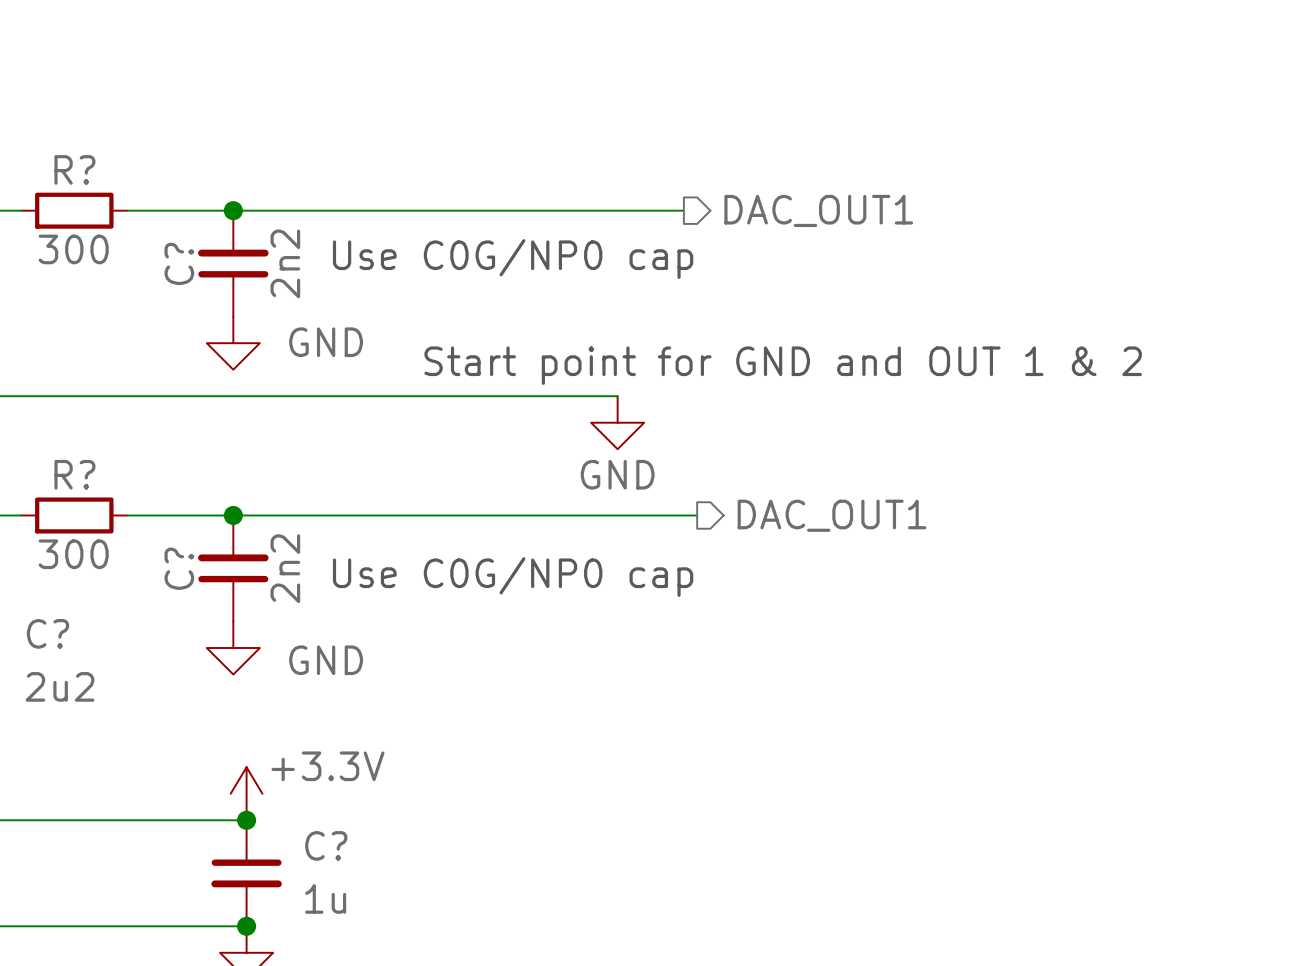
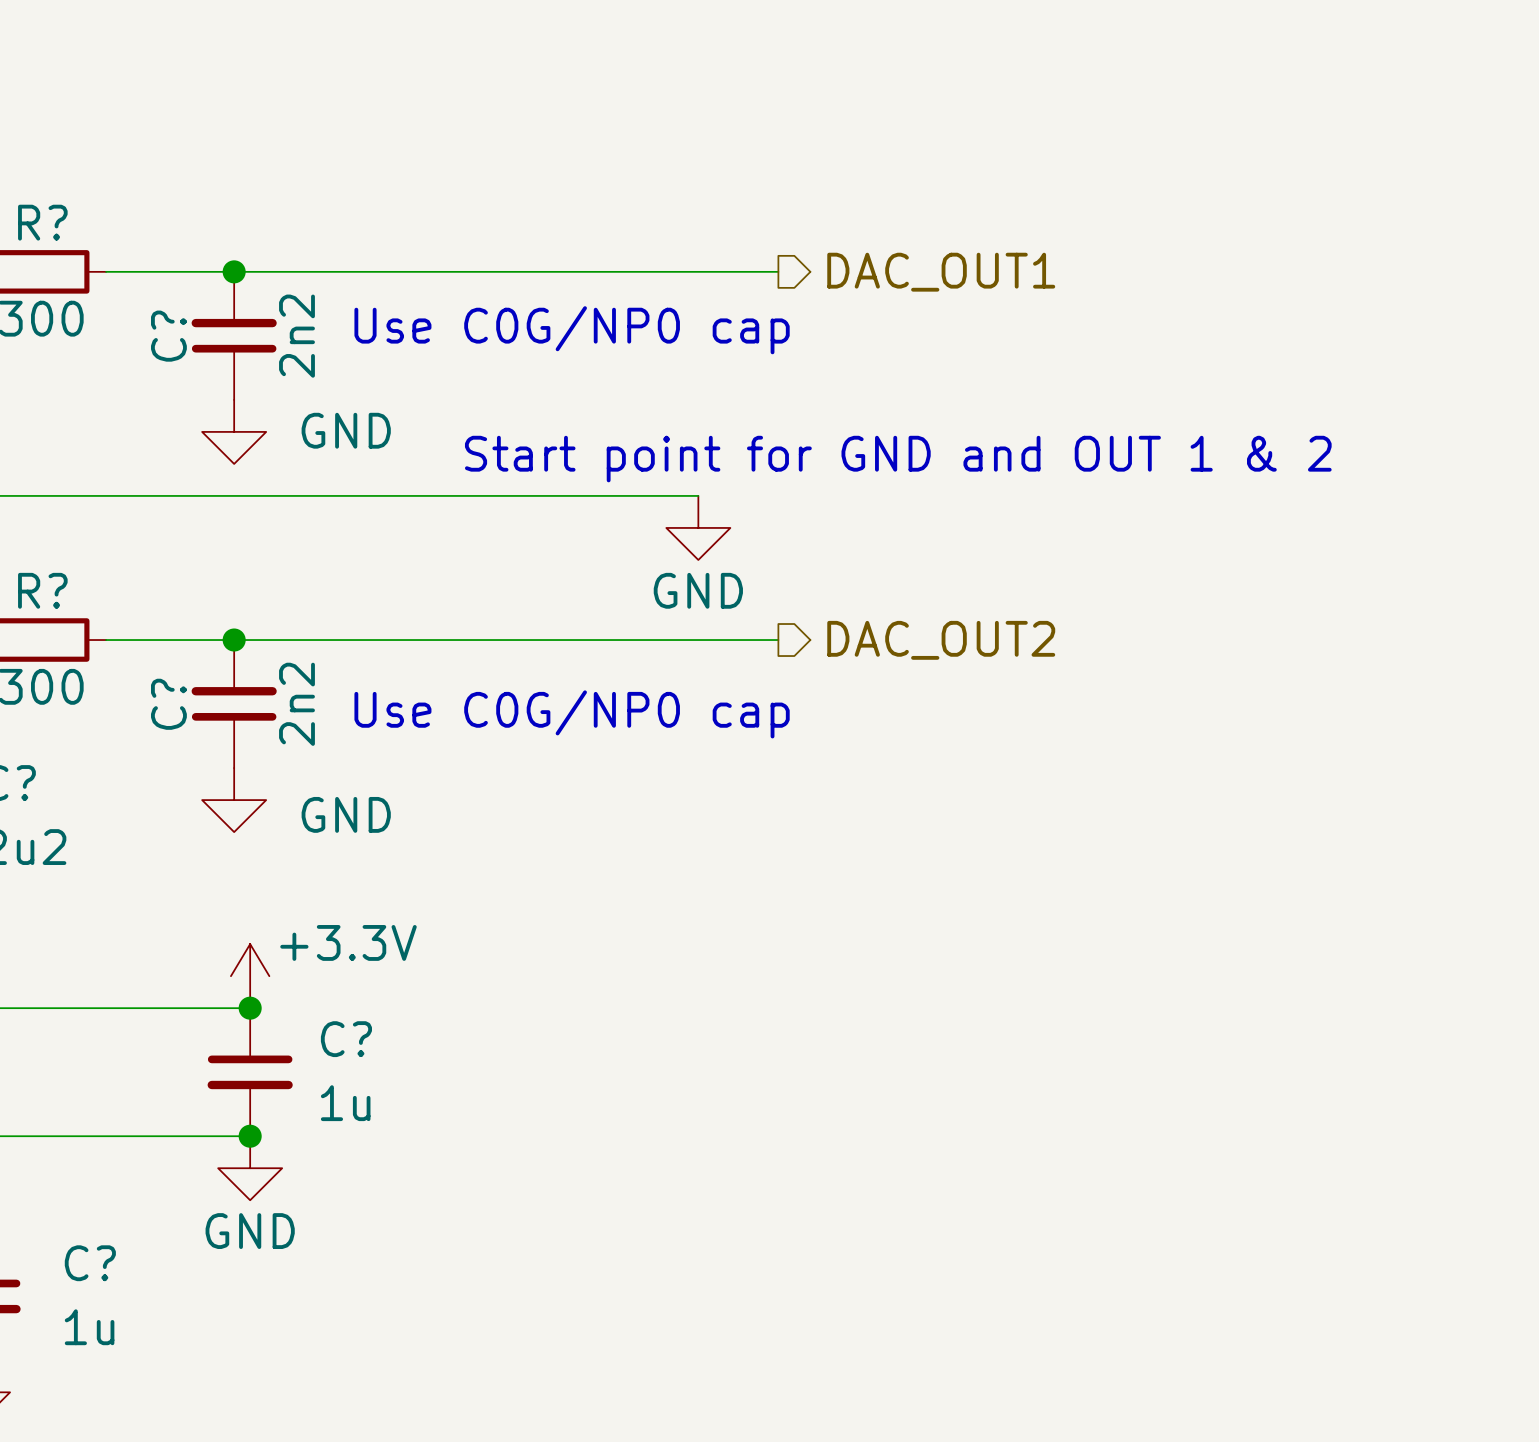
wire: (683, 515) (697, 515) -> none
hierarchical label: DAC_OUT1 (831, 515) -> DAC_OUT2 (941, 640)

